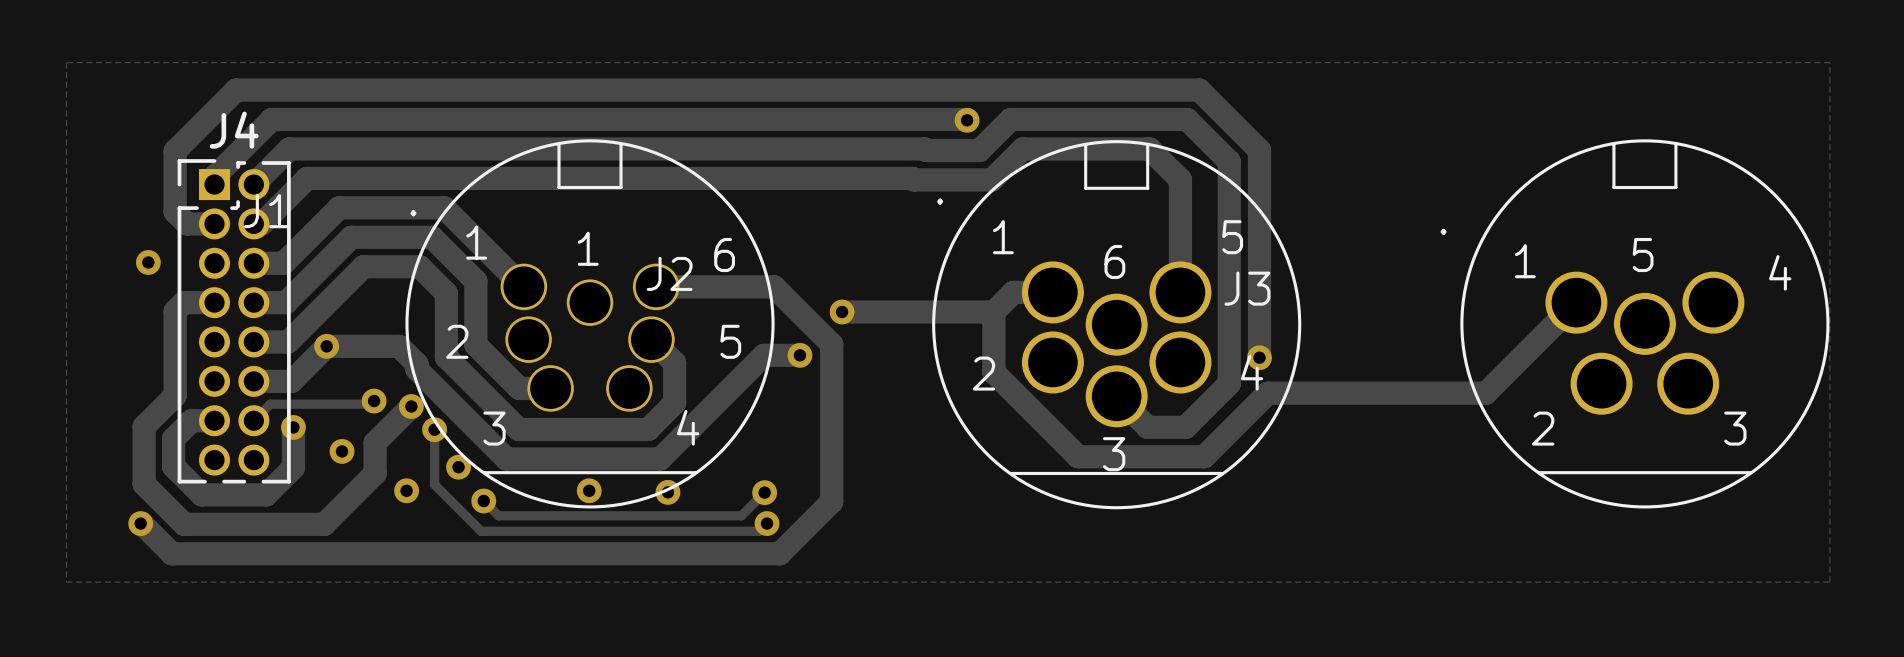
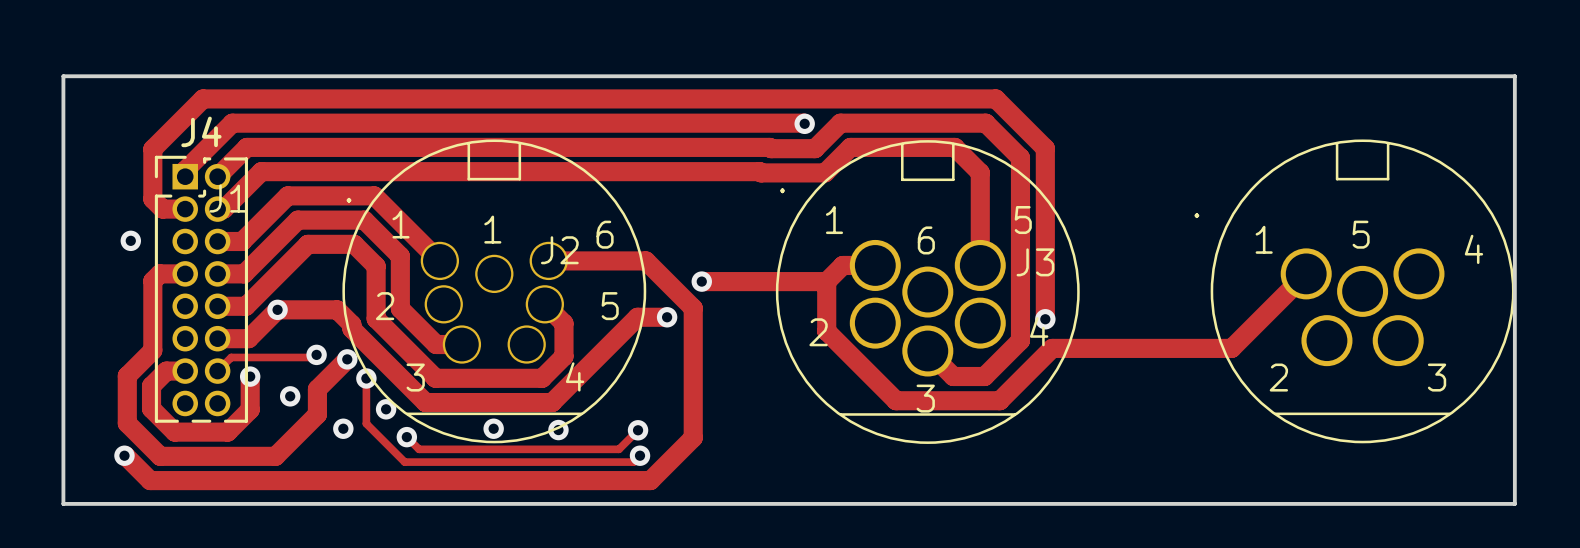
board edge: none -> (63, 76) (1514, 76) (1514, 503) (63, 503) (63, 76)

